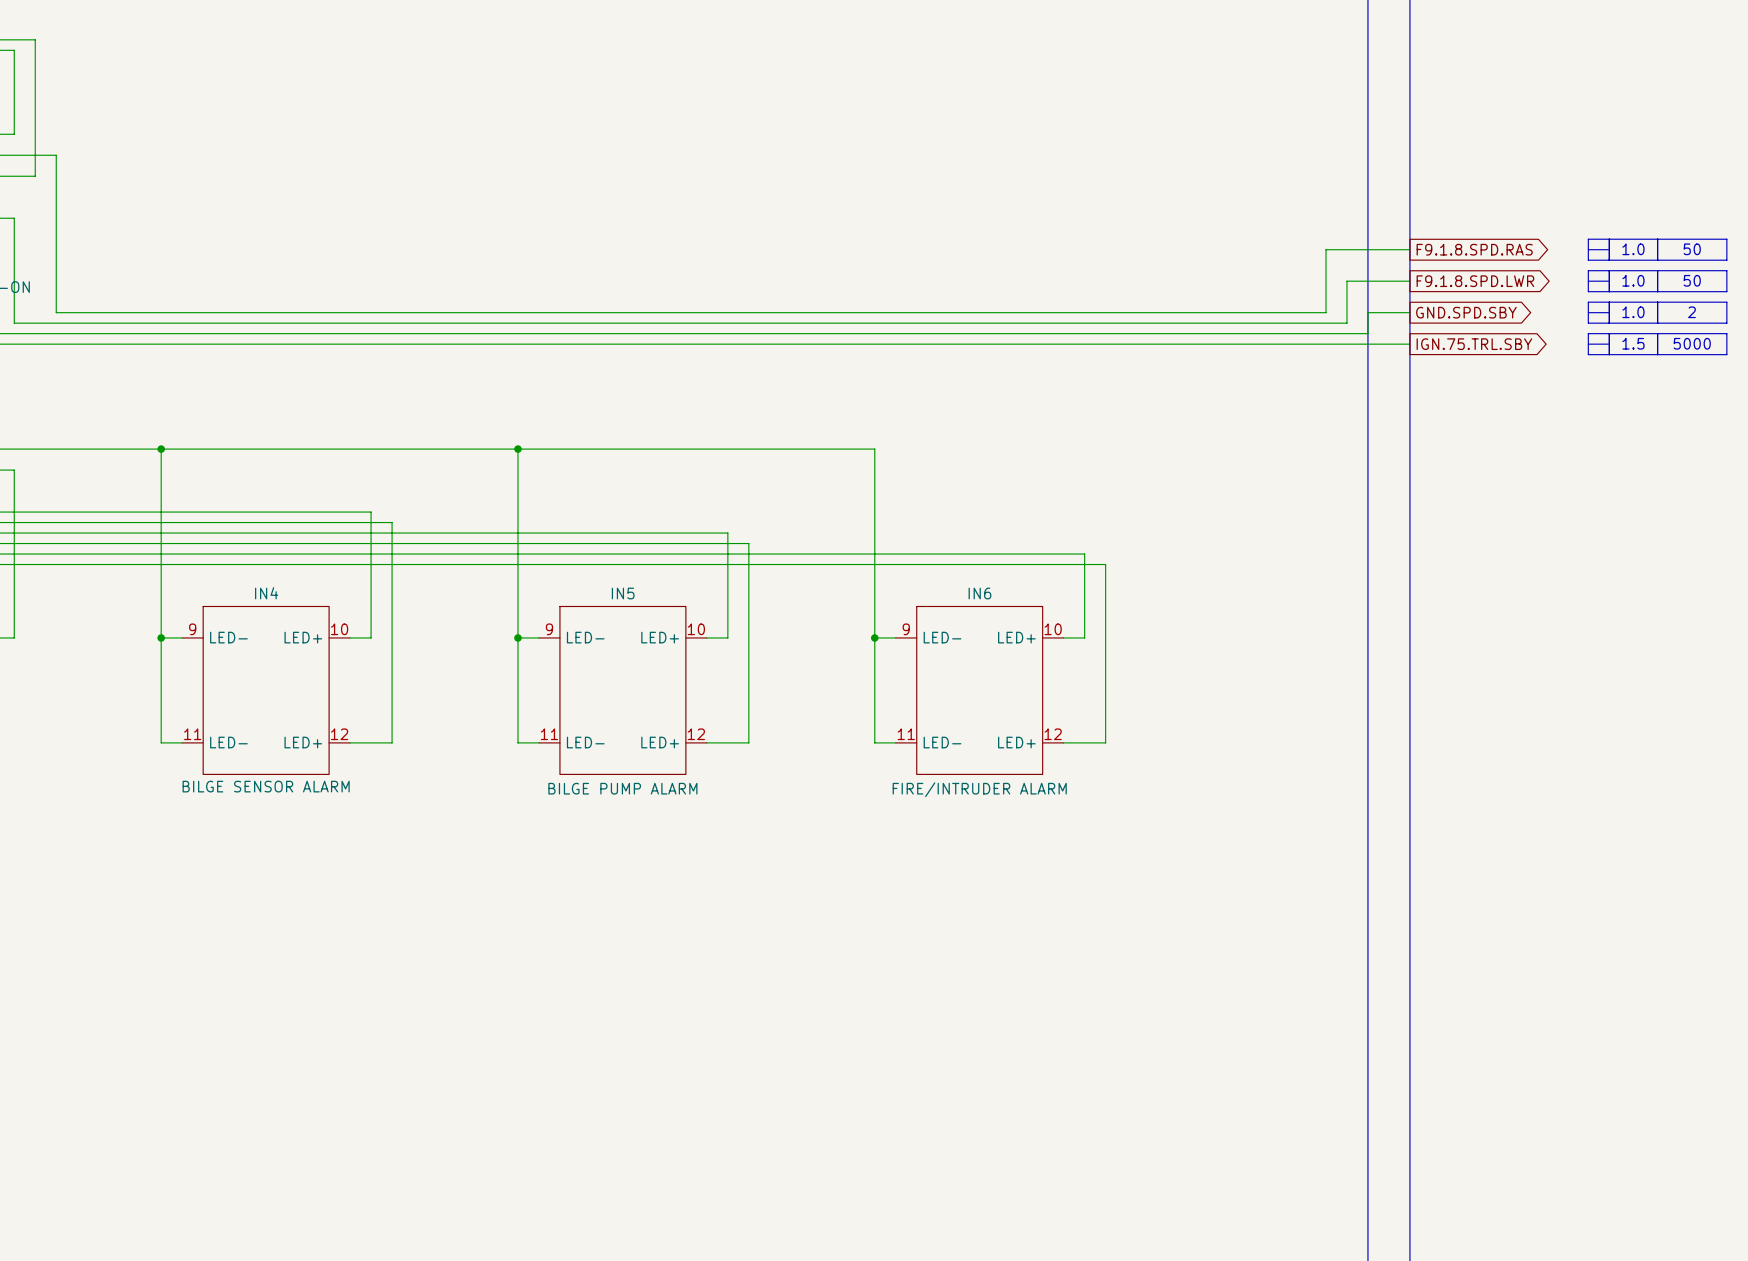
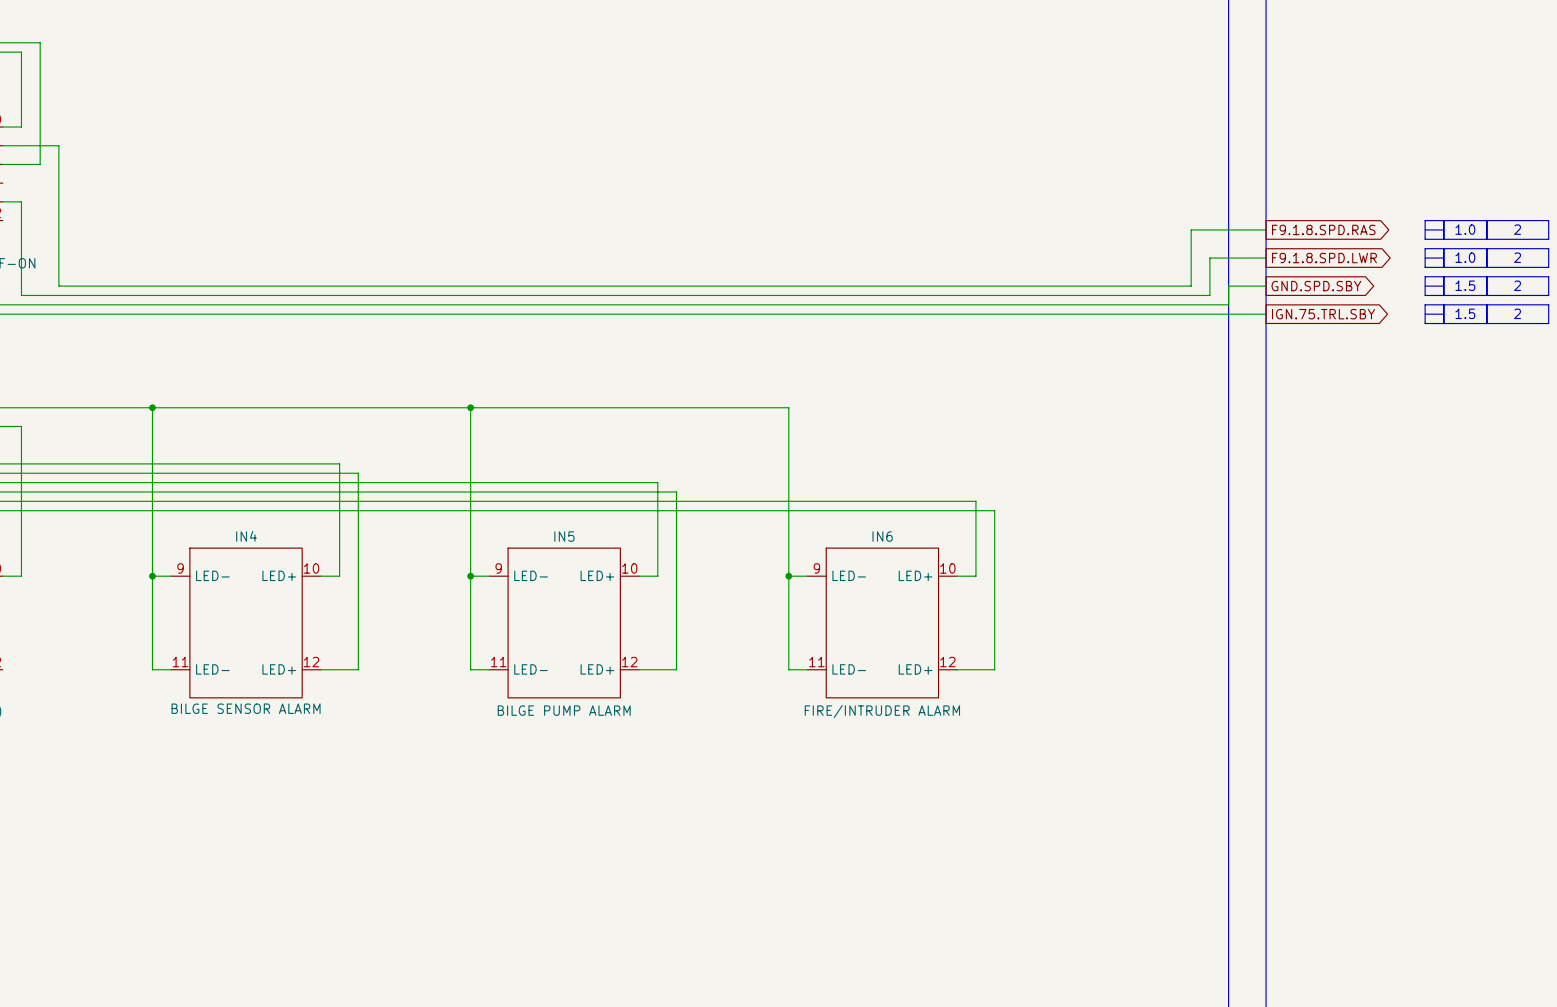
text: 50 (1692, 249) -> 2 (1517, 229)
text: 50 (1692, 280) -> 2 (1517, 257)
text: 1.0 (1633, 312) -> 1.5 (1465, 285)
text: 5000 (1692, 343) -> 2 (1517, 313)

